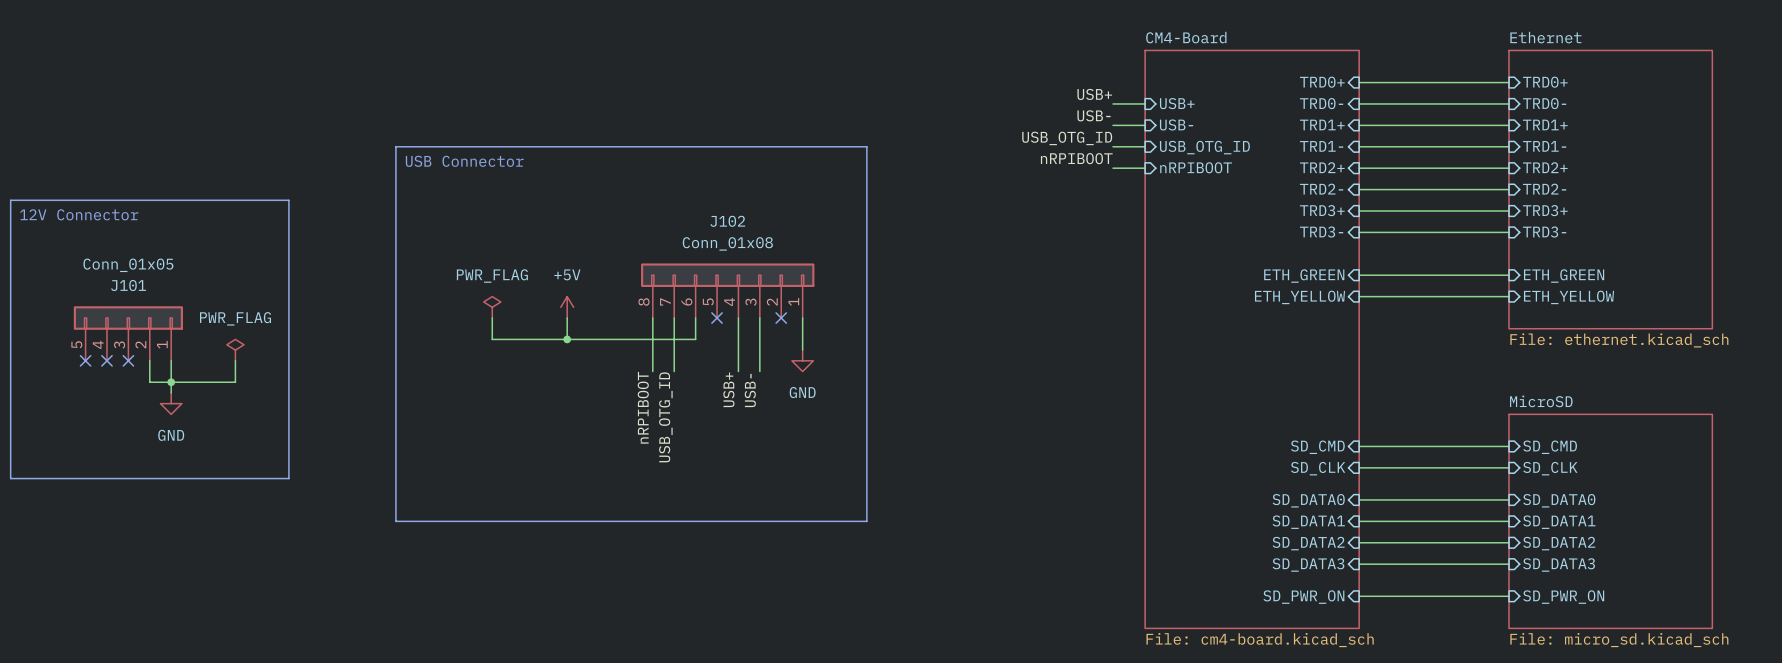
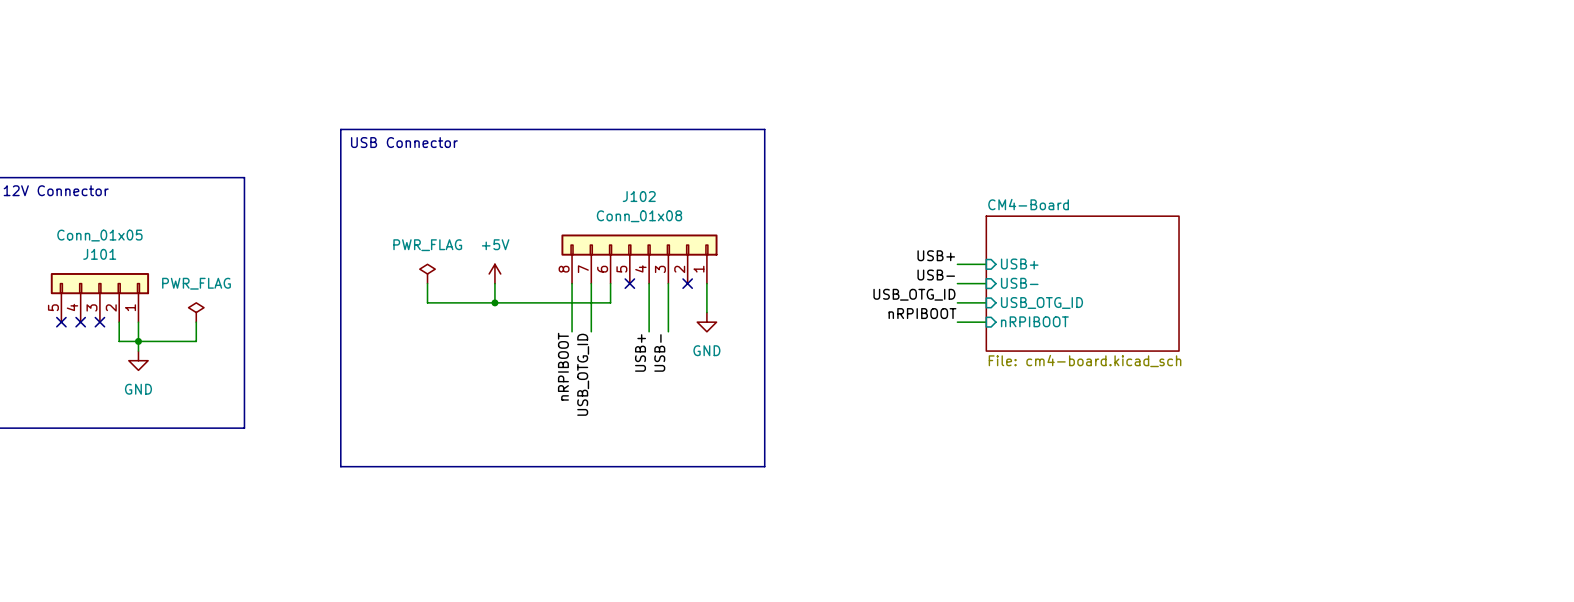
sheet CM4-Board name position: CM4-Board (1186, 37) -> CM4-Board (1028, 204)
sheet CM4-Board shape: [1144, 49, 1360, 630] -> [985, 215, 1180, 352]
sheet pin: TRD0+ (1322, 82) -> none
wire: (1359, 82) (1509, 82) -> none
sheet pin: TRD0+ (1545, 82) -> none
label position: USB+ (1094, 94) -> USB+ (936, 255)
wire: (1113, 103) (1145, 103) -> (957, 264) (986, 264)
sheet pin position: USB+ (1177, 103) -> USB+ (1019, 263)
sheet pin: TRD0- (1321, 103) -> none
wire: (1359, 103) (1509, 103) -> none
sheet pin: TRD0- (1544, 103) -> none
label position: USB- (1094, 115) -> USB- (936, 275)
sheet pin position: USB- (1176, 124) -> USB- (1019, 283)
sheet pin: TRD1+ (1322, 124) -> none
sheet pin: TRD1+ (1545, 124) -> none
wire: (1113, 125) (1145, 125) -> (957, 283) (986, 283)
wire: (1359, 125) (1509, 125) -> none
label position: USB_OTG_ID (1067, 138) -> USB_OTG_ID (914, 294)
wire: (1113, 146) (1145, 146) -> (957, 302) (986, 302)
sheet pin: TRD1- (1321, 146) -> none
wire: (1359, 146) (1509, 146) -> none
sheet pin: TRD1- (1544, 146) -> none
sheet pin position: USB_OTG_ID (1204, 147) -> USB_OTG_ID (1041, 302)
label position: nRPIBOOT (1076, 158) -> nRPIBOOT (922, 313)
sheet pin position: nRPIBOOT (1196, 167) -> nRPIBOOT (1034, 321)
sheet pin: TRD2+ (1322, 167) -> none
sheet pin: TRD2+ (1545, 167) -> none
wire: (1113, 168) (1145, 168) -> (957, 322) (986, 322)
wire: (1359, 168) (1509, 168) -> none
sheet pin: TRD2- (1321, 189) -> none
wire: (1359, 189) (1509, 189) -> none
sheet pin: TRD2- (1544, 189) -> none
sheet Ethernet: File: ethernet.kicad_sch (1610, 189) -> none
sheet pin: TRD3+ (1322, 210) -> none
sheet pin: TRD3+ (1545, 210) -> none
wire: (1359, 211) (1509, 211) -> none
sheet pin: TRD3- (1321, 232) -> none
wire: (1359, 232) (1509, 232) -> none
sheet pin: TRD3- (1544, 232) -> none
wire: (1359, 275) (1509, 275) -> none
sheet pin: ETH_GREEN (1304, 276) -> none
sheet pin: ETH_GREEN (1564, 276) -> none
wire: (1359, 296) (1509, 296) -> none
sheet pin: ETH_YELLOW (1299, 297) -> none
sheet pin: ETH_YELLOW (1569, 297) -> none
wire: (1359, 446) (1509, 446) -> none
sheet pin: SD_CMD (1317, 447) -> none
sheet pin: SD_CMD (1550, 447) -> none
wire: (1359, 467) (1509, 467) -> none
sheet pin: SD_CLK (1318, 468) -> none
sheet pin: SD_CLK (1550, 468) -> none
wire: (1359, 499) (1509, 499) -> none
sheet pin: SD_DATA0 (1308, 500) -> none
sheet pin: SD_DATA0 (1559, 500) -> none
wire: (1359, 521) (1509, 521) -> none
sheet MicroSD: File: micro_sd.kicad_sch (1610, 521) -> none
sheet pin: SD_DATA1 (1308, 522) -> none
sheet pin: SD_DATA1 (1559, 522) -> none
wire: (1359, 542) (1509, 542) -> none
sheet pin: SD_DATA2 (1308, 543) -> none
sheet pin: SD_DATA2 (1559, 543) -> none
sheet pin: SD_DATA3 (1308, 564) -> none
wire: (1359, 564) (1509, 564) -> none
sheet pin: SD_DATA3 (1559, 564) -> none
wire: (1359, 596) (1509, 596) -> none
sheet pin: SD_PWR_ON (1303, 597) -> none
sheet pin: SD_PWR_ON (1563, 597) -> none
sheet CM4-Board value position: File: cm4-board.kicad_sch (1260, 640) -> File: cm4-board.kicad_sch (1085, 361)

